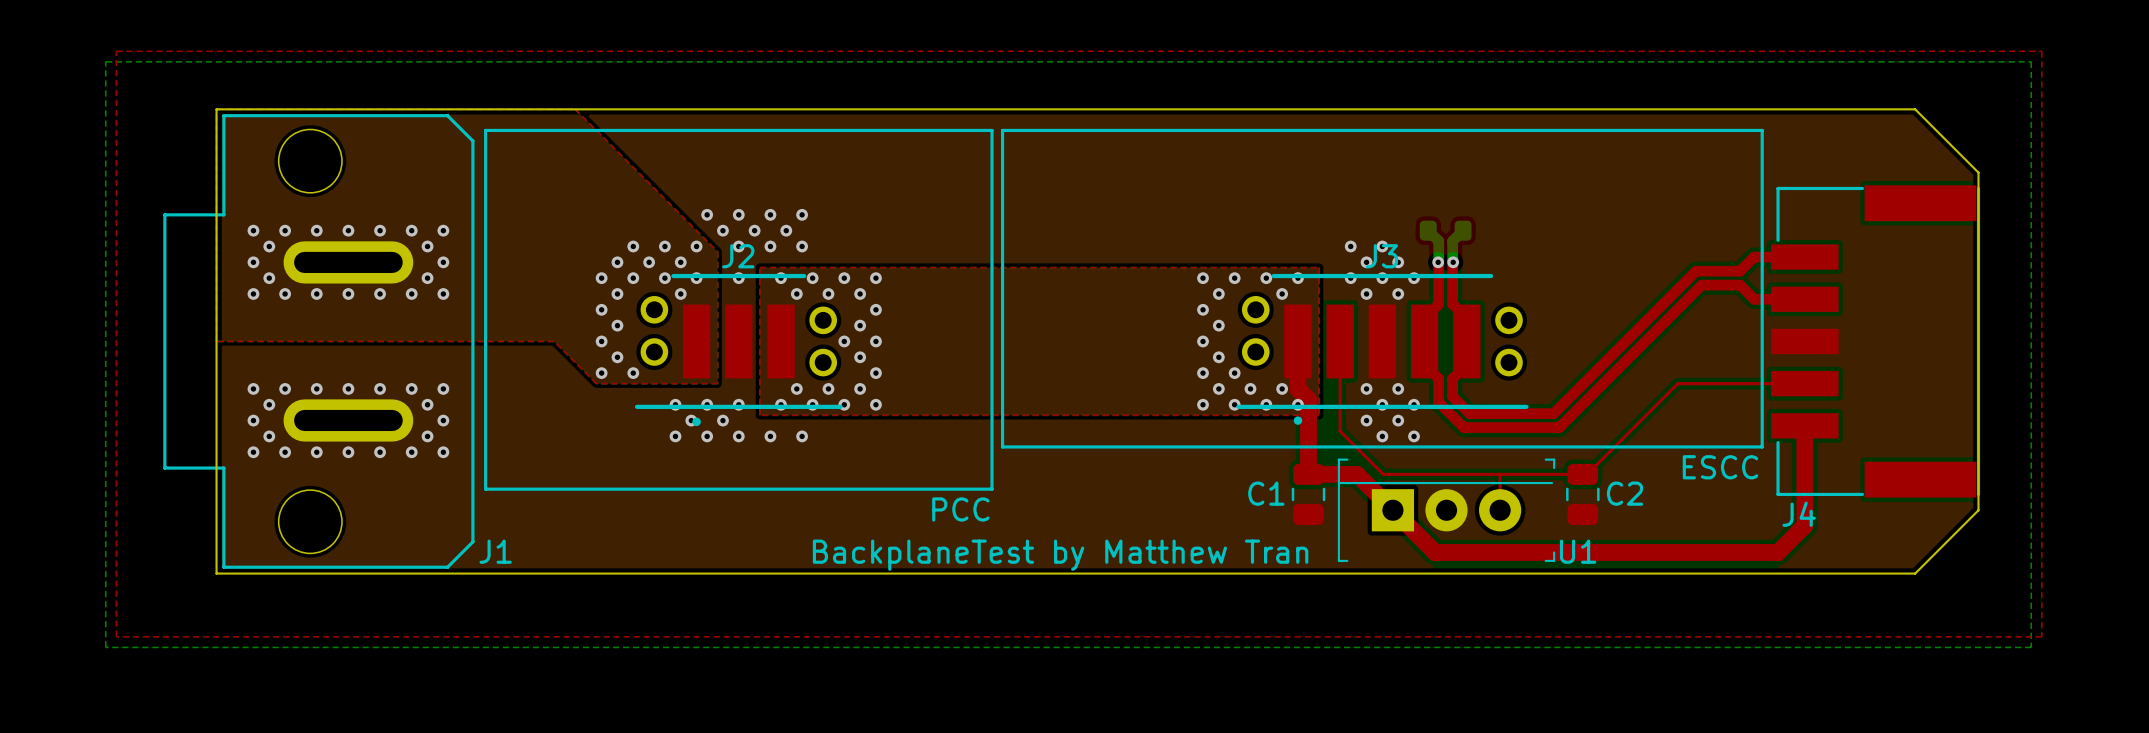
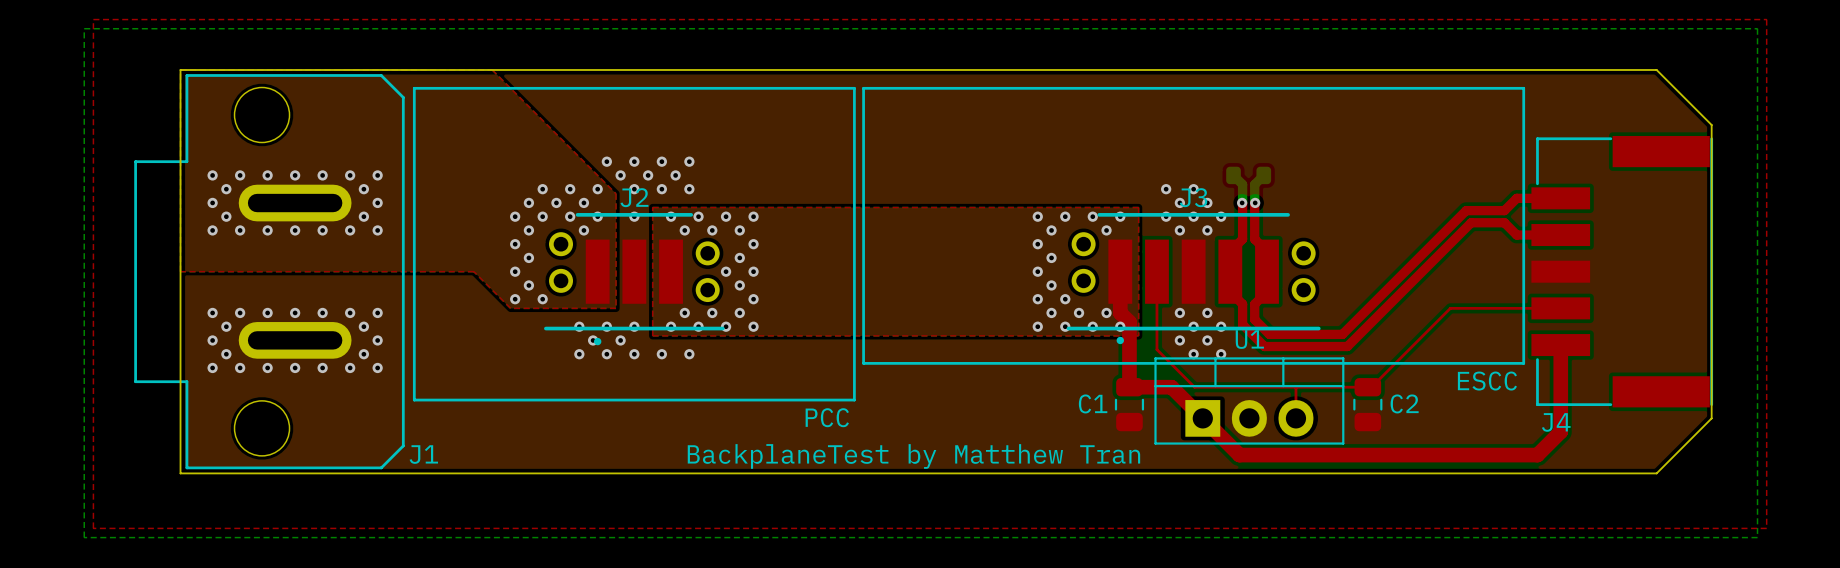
U1 footprint: [1337, 458, 1556, 562] -> [1154, 357, 1345, 445]
U1 name position: U1 (1578, 551) -> U1 (1249, 339)

